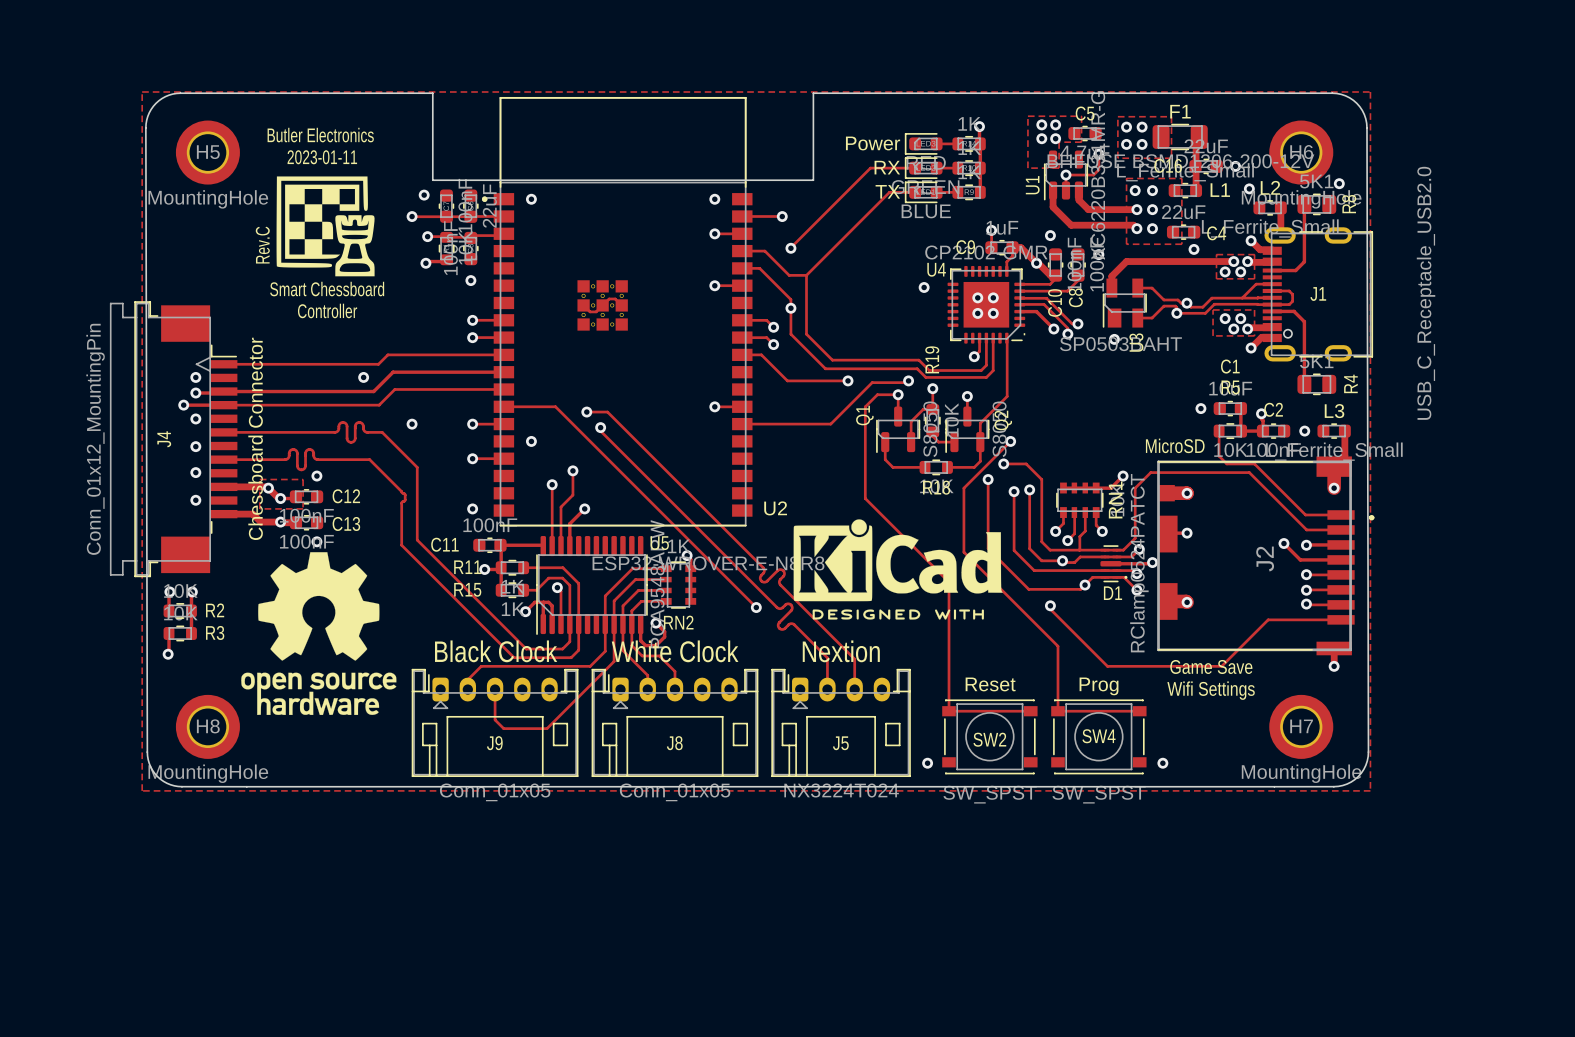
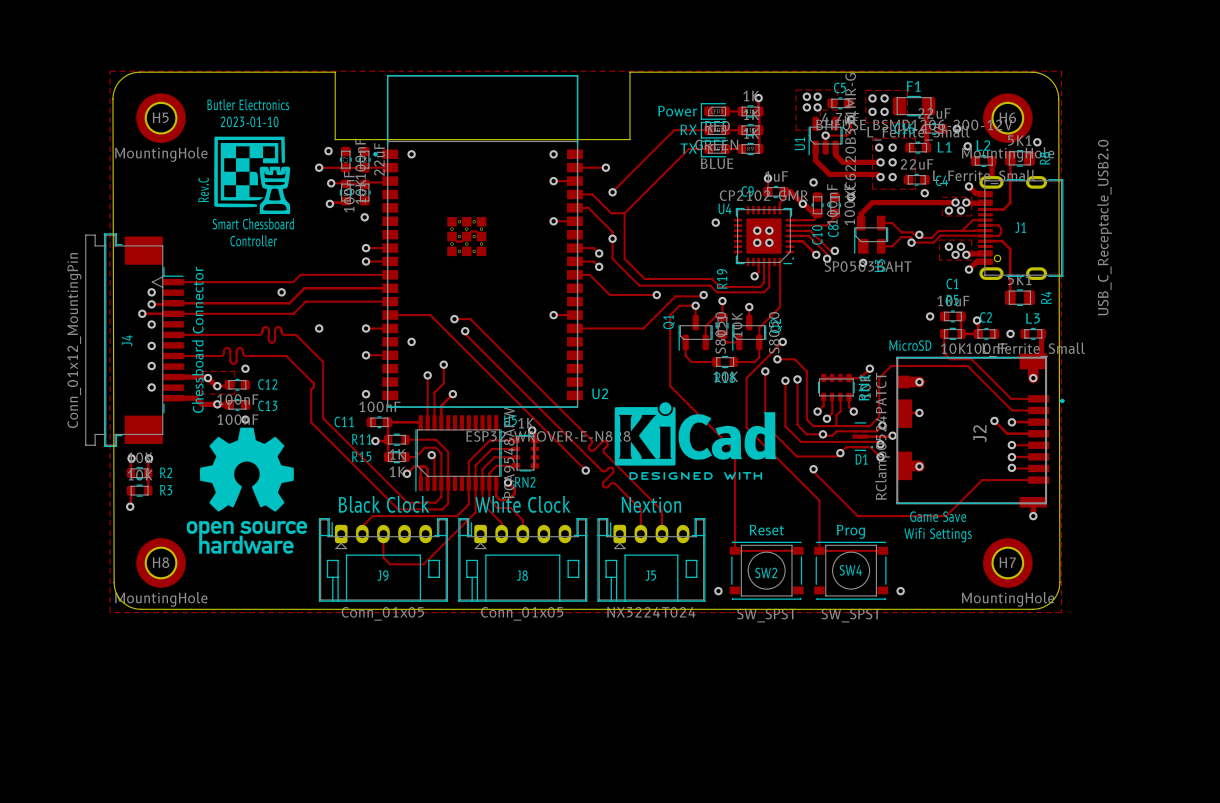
text: 2023-01-11 (322, 157) -> 2023-01-10 (249, 121)

